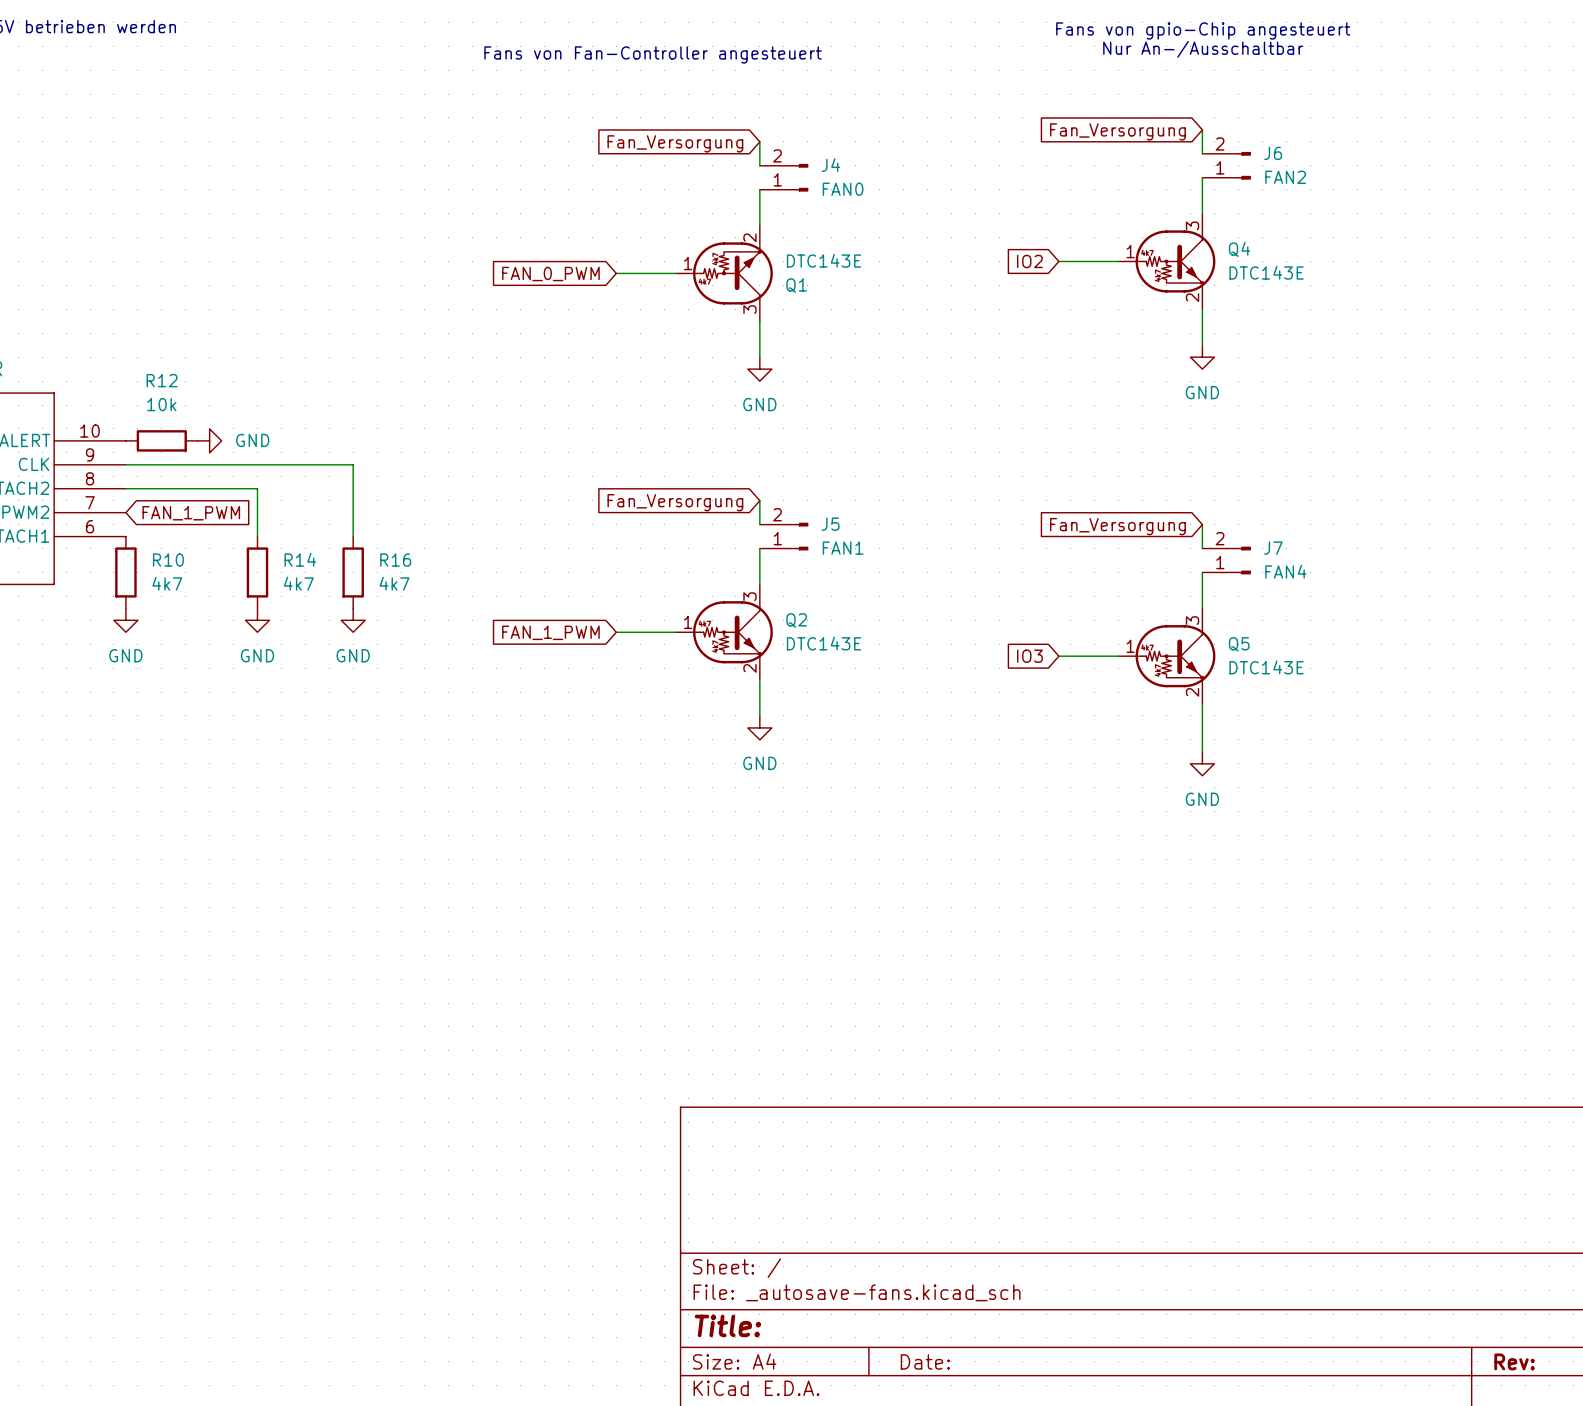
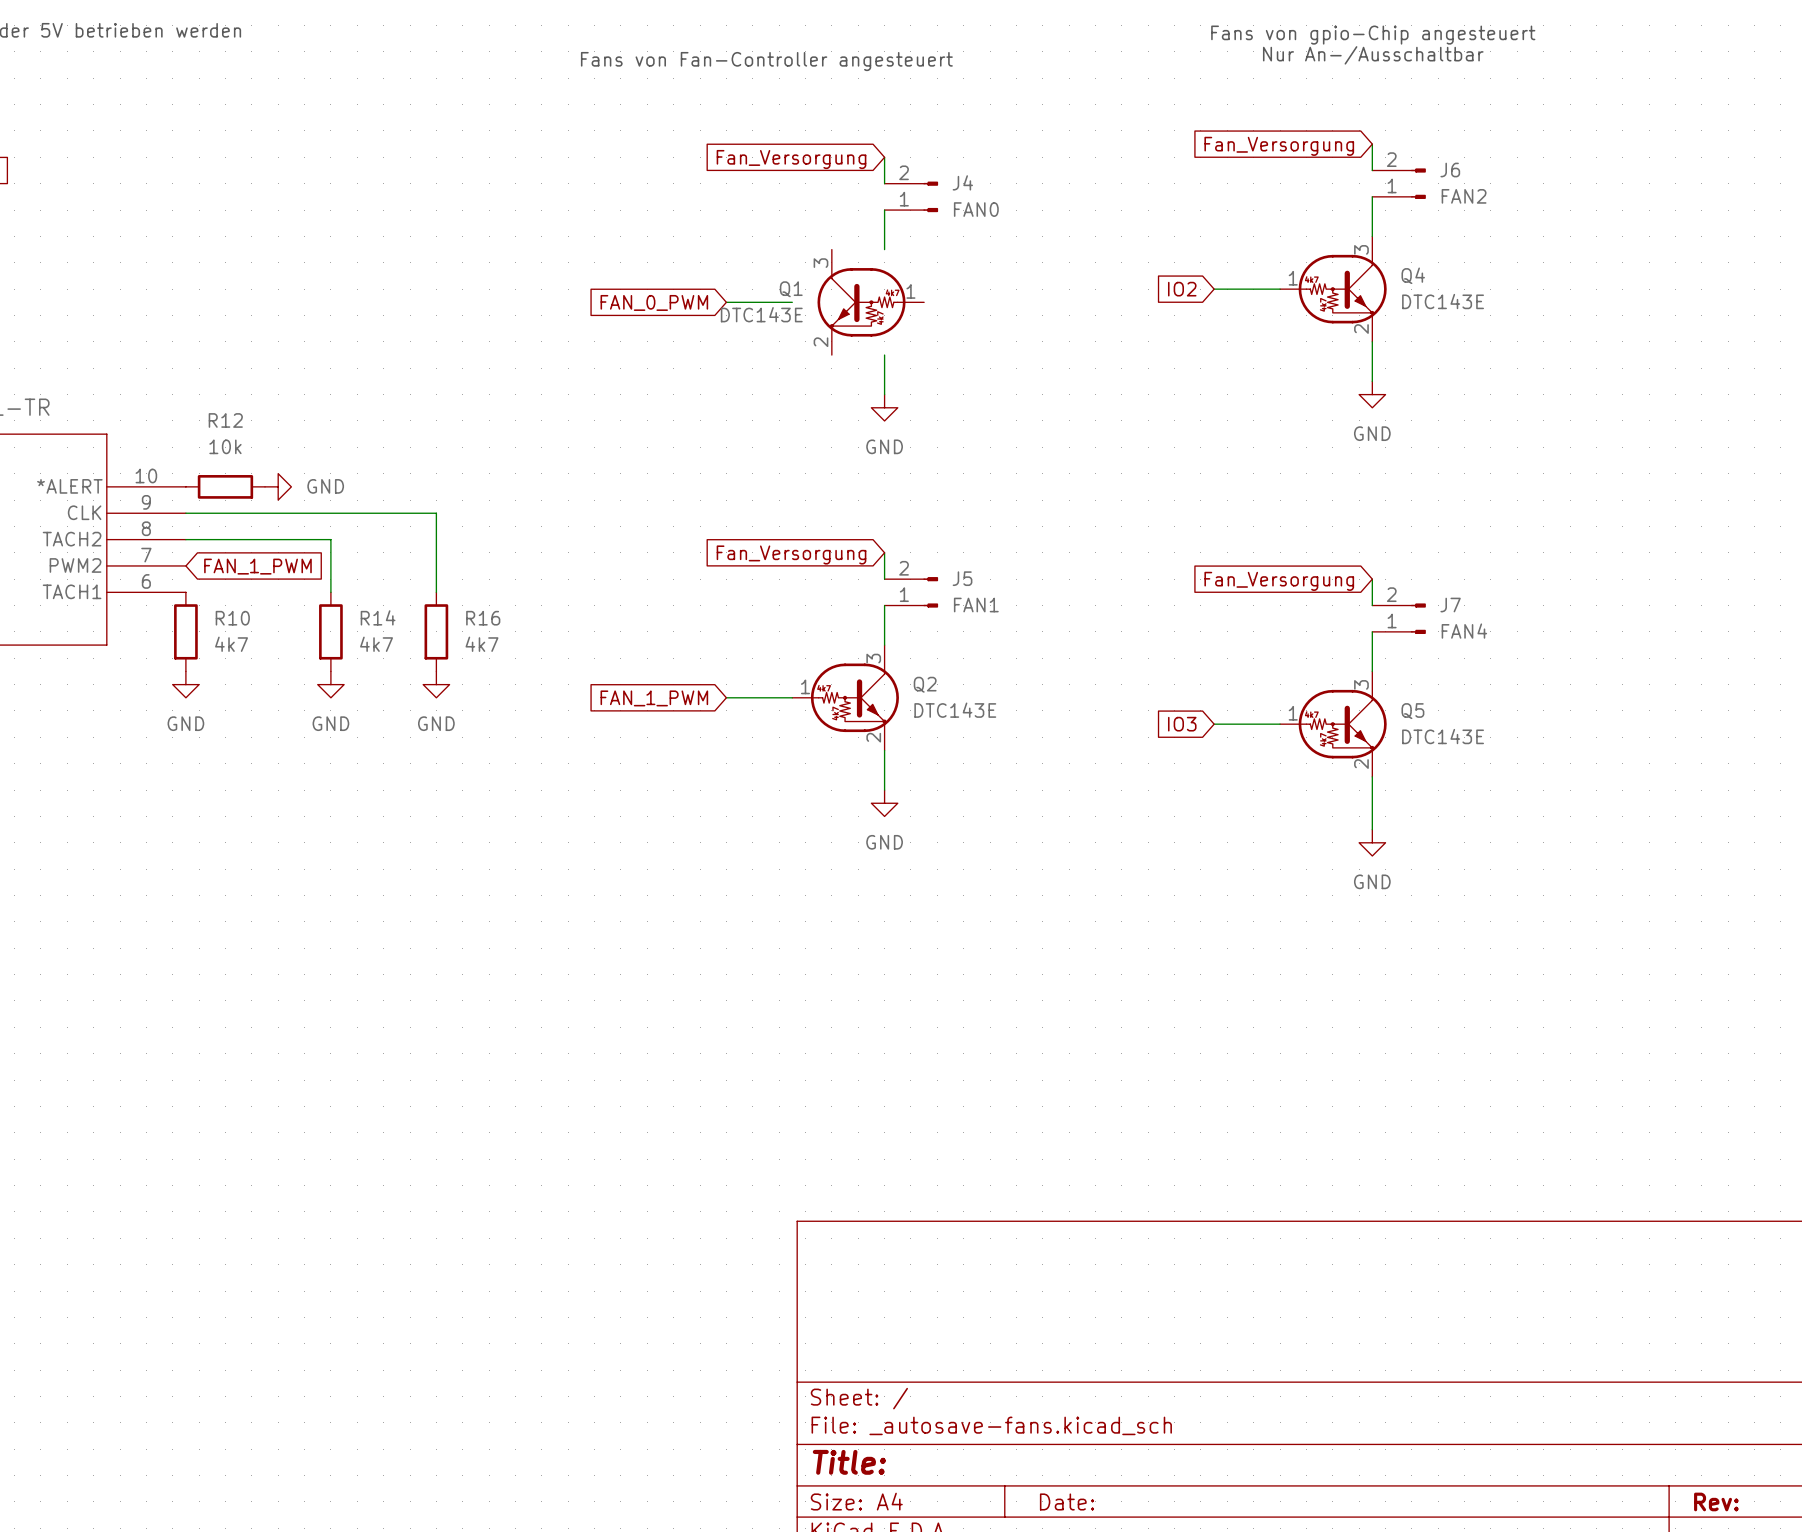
Q1 rotation: 0° (732, 273) -> 180° (861, 302)

